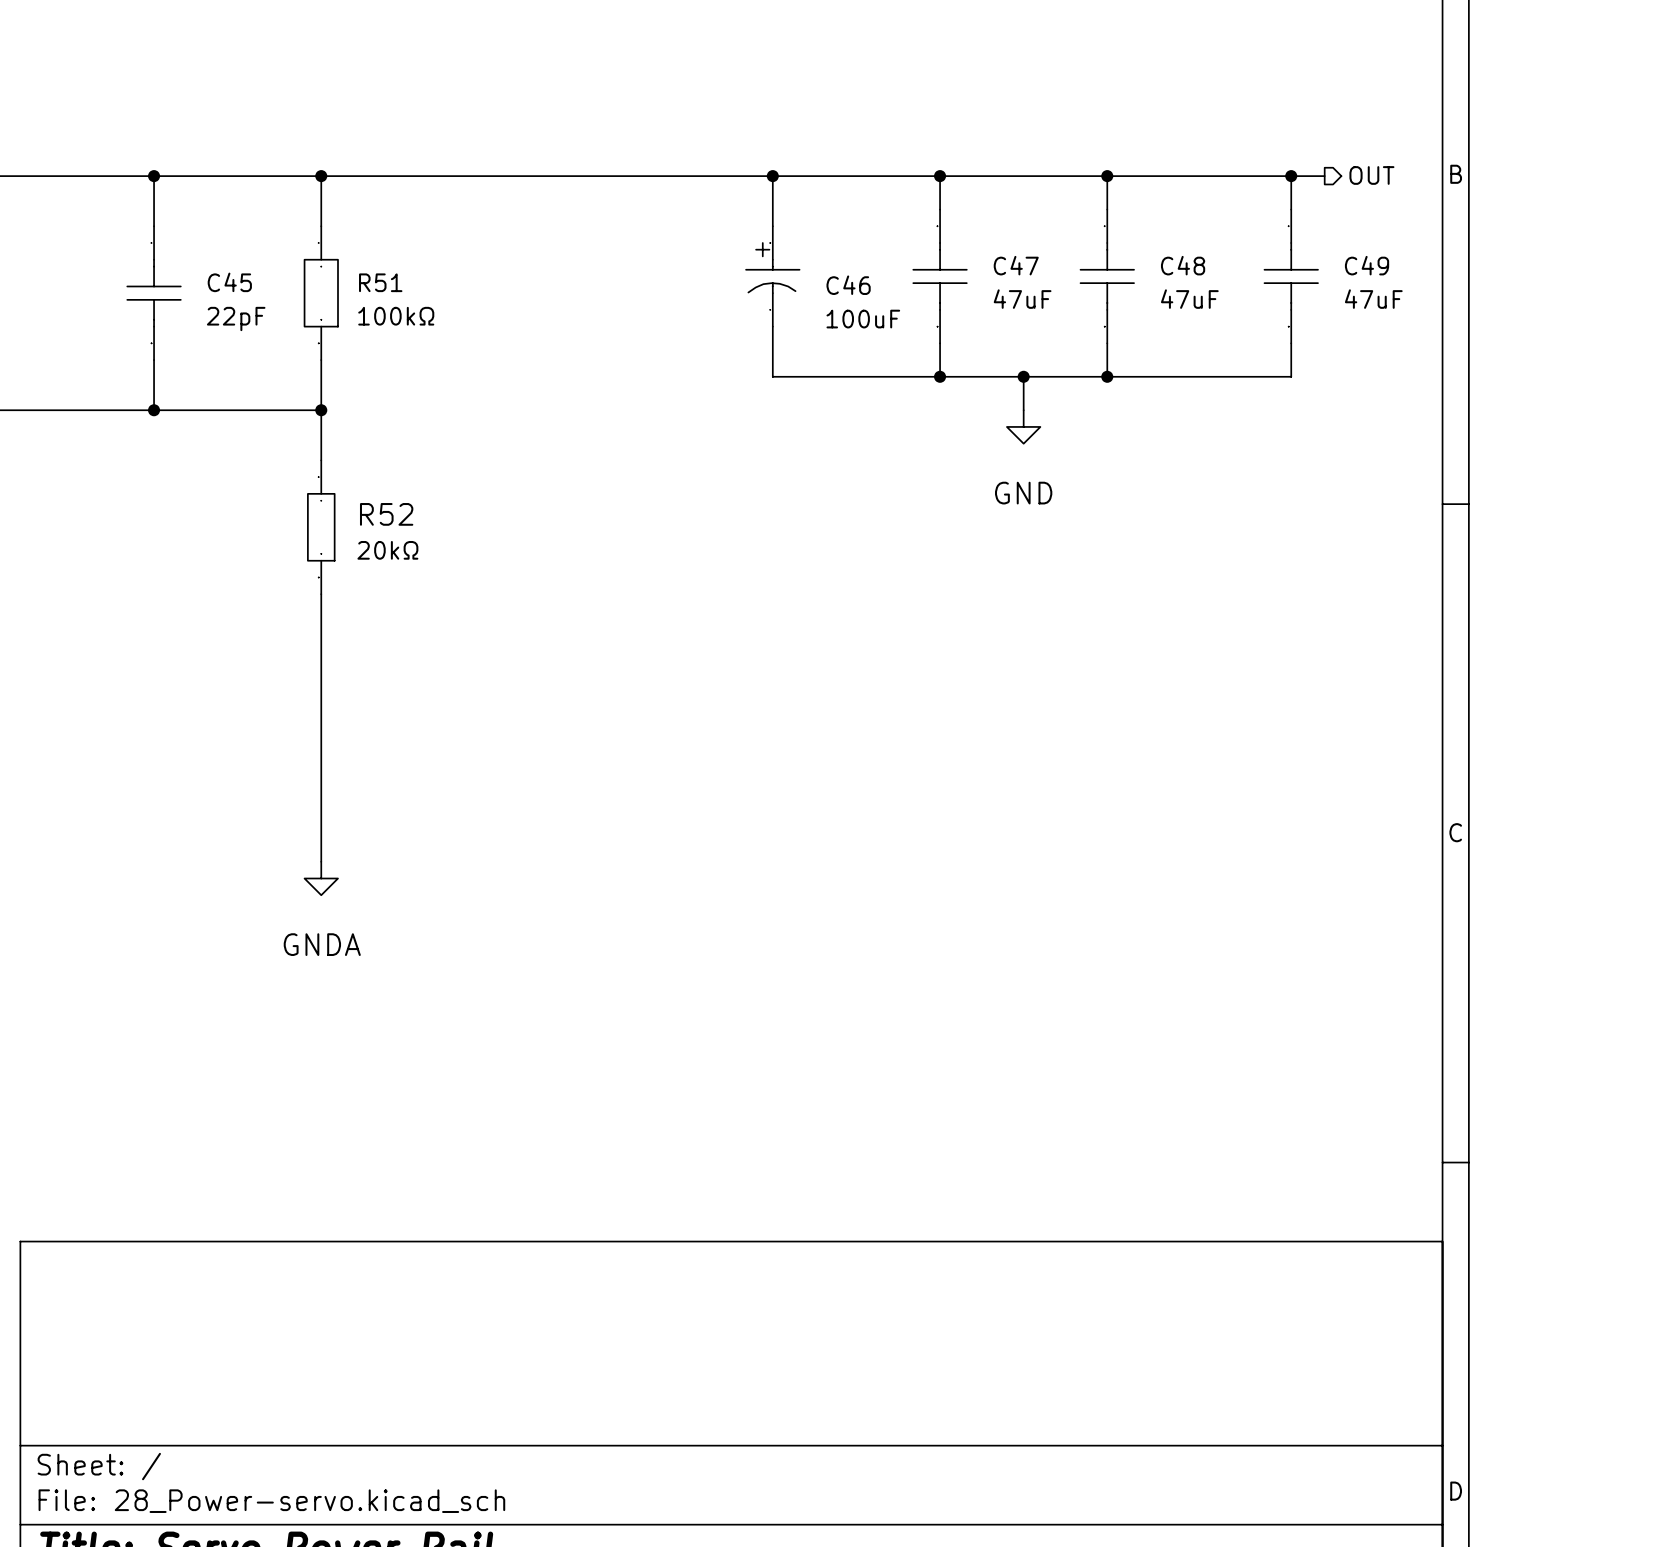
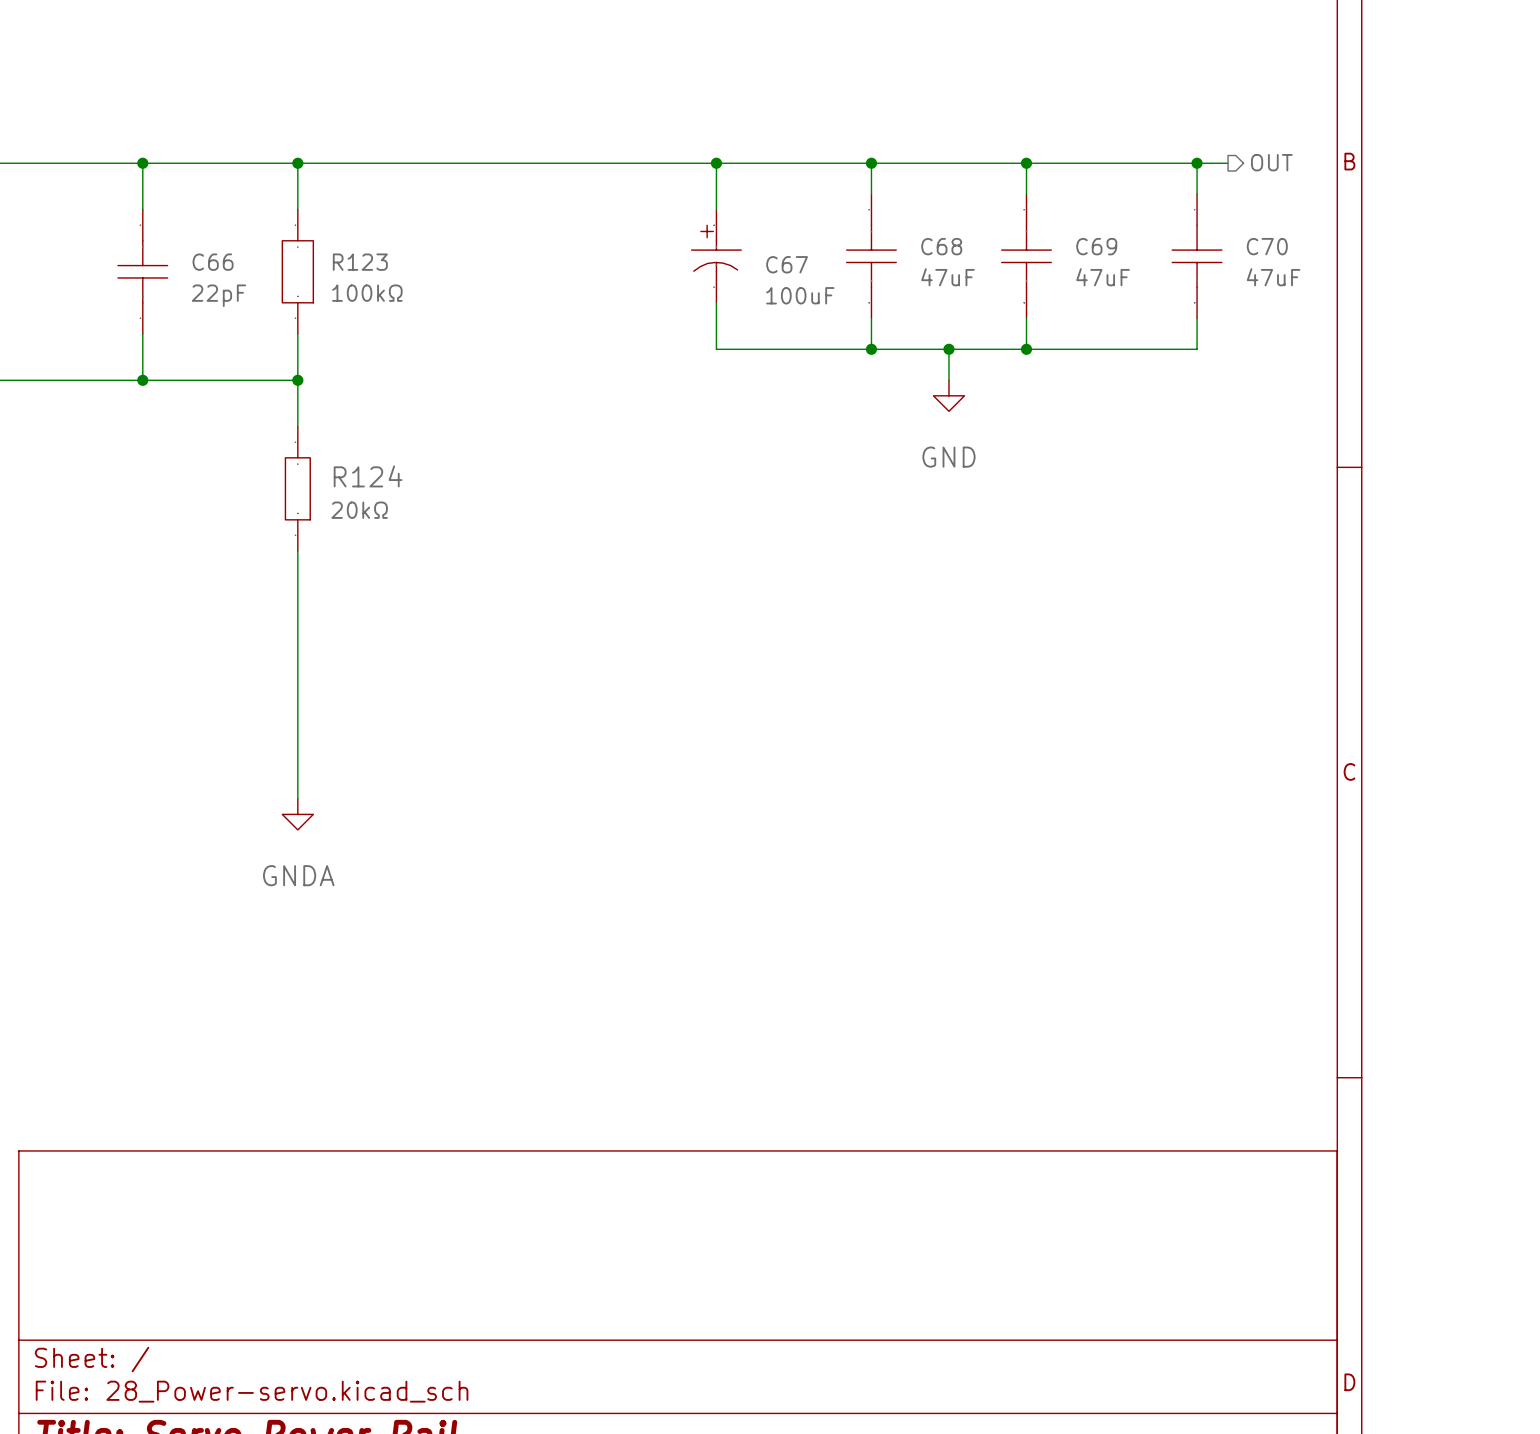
C47 name: C47 (1016, 265) -> C68 (941, 246)
C48 name: C48 (1183, 265) -> C69 (1096, 246)
C49 name: C49 (1367, 265) -> C70 (1267, 246)
C45 name: C45 (229, 282) -> C66 (213, 262)
R51 name: R51 (380, 282) -> R123 (360, 262)
C46 name: C46 (848, 285) -> C67 (787, 264)
R52 name: R52 (386, 514) -> R124 (368, 476)

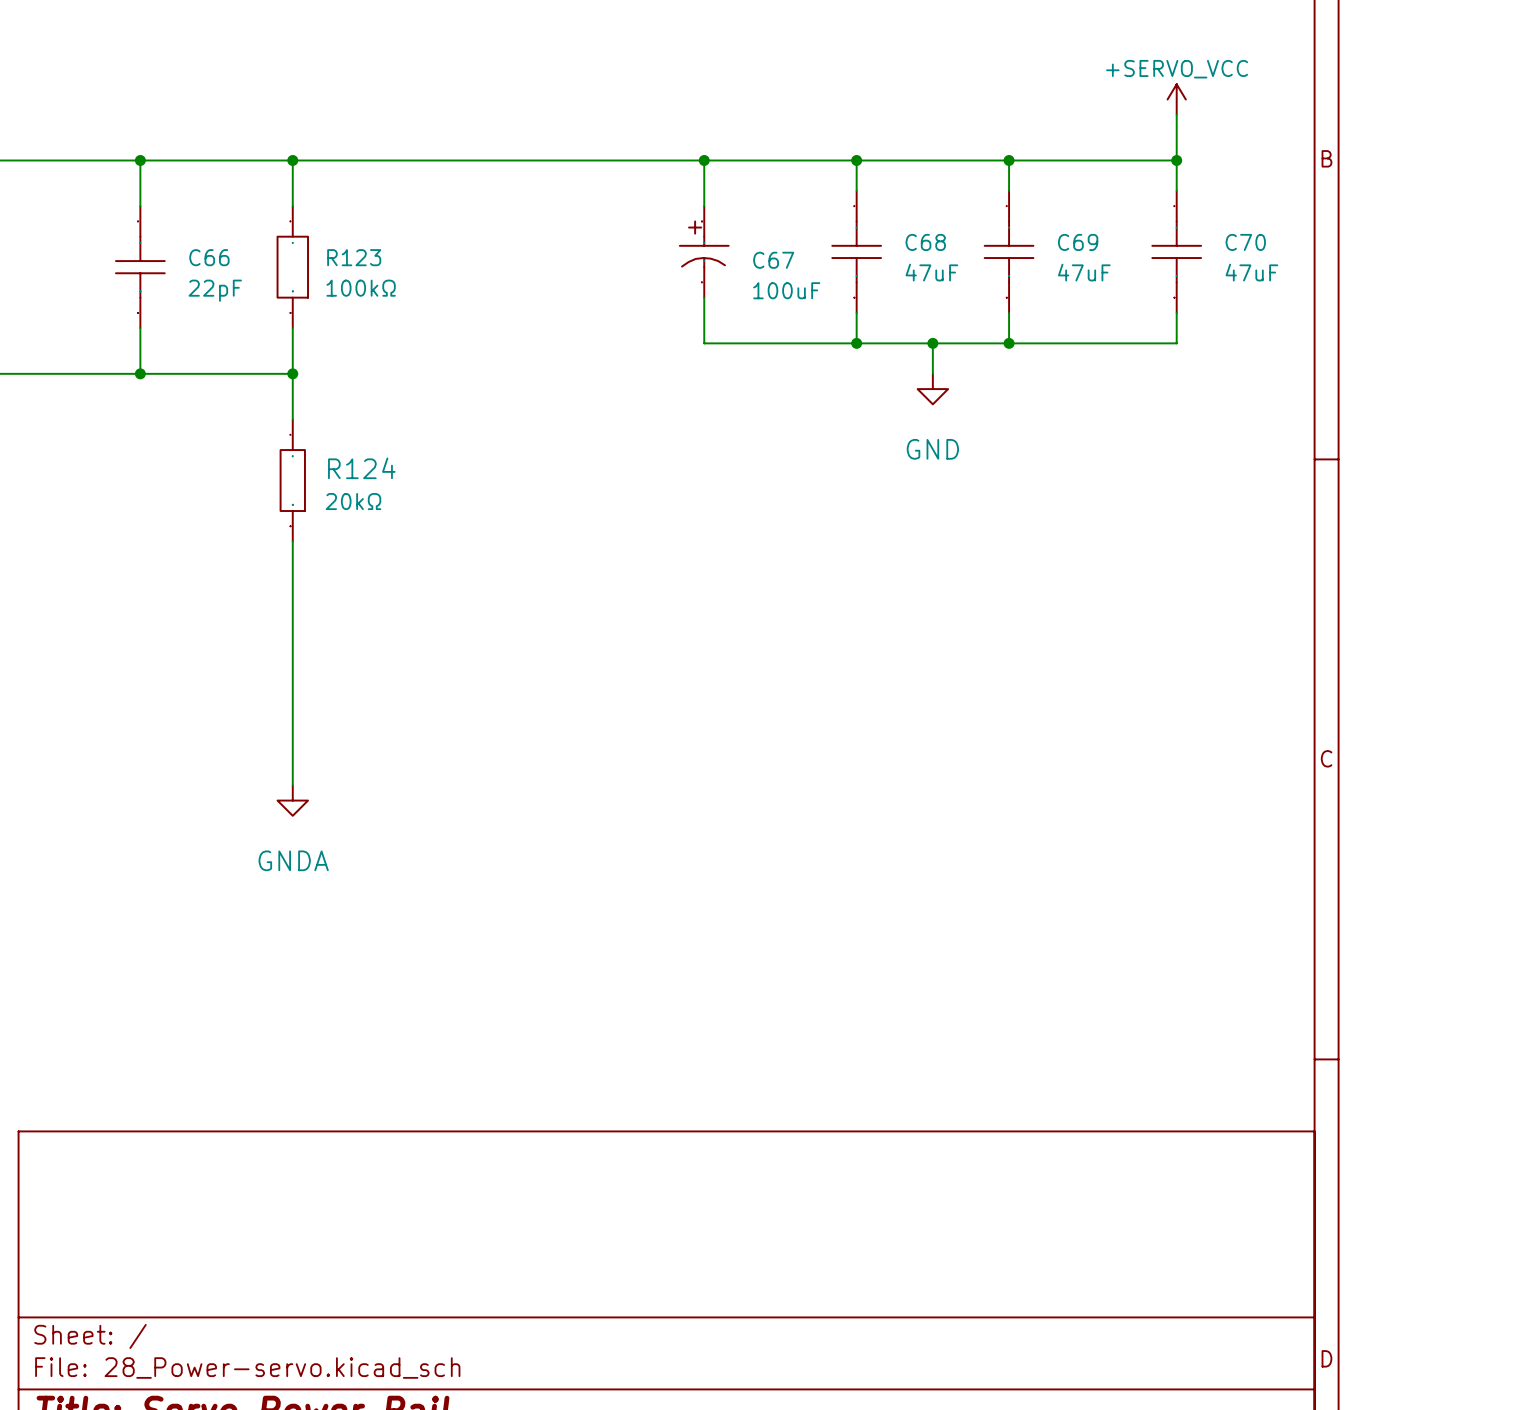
power symbol: none -> +SERVO_VCC (1176, 99)
hierarchical label: OUT (1271, 162) -> none
wire: (1197, 163) (1228, 163) -> (1176, 160) (1176, 114)

